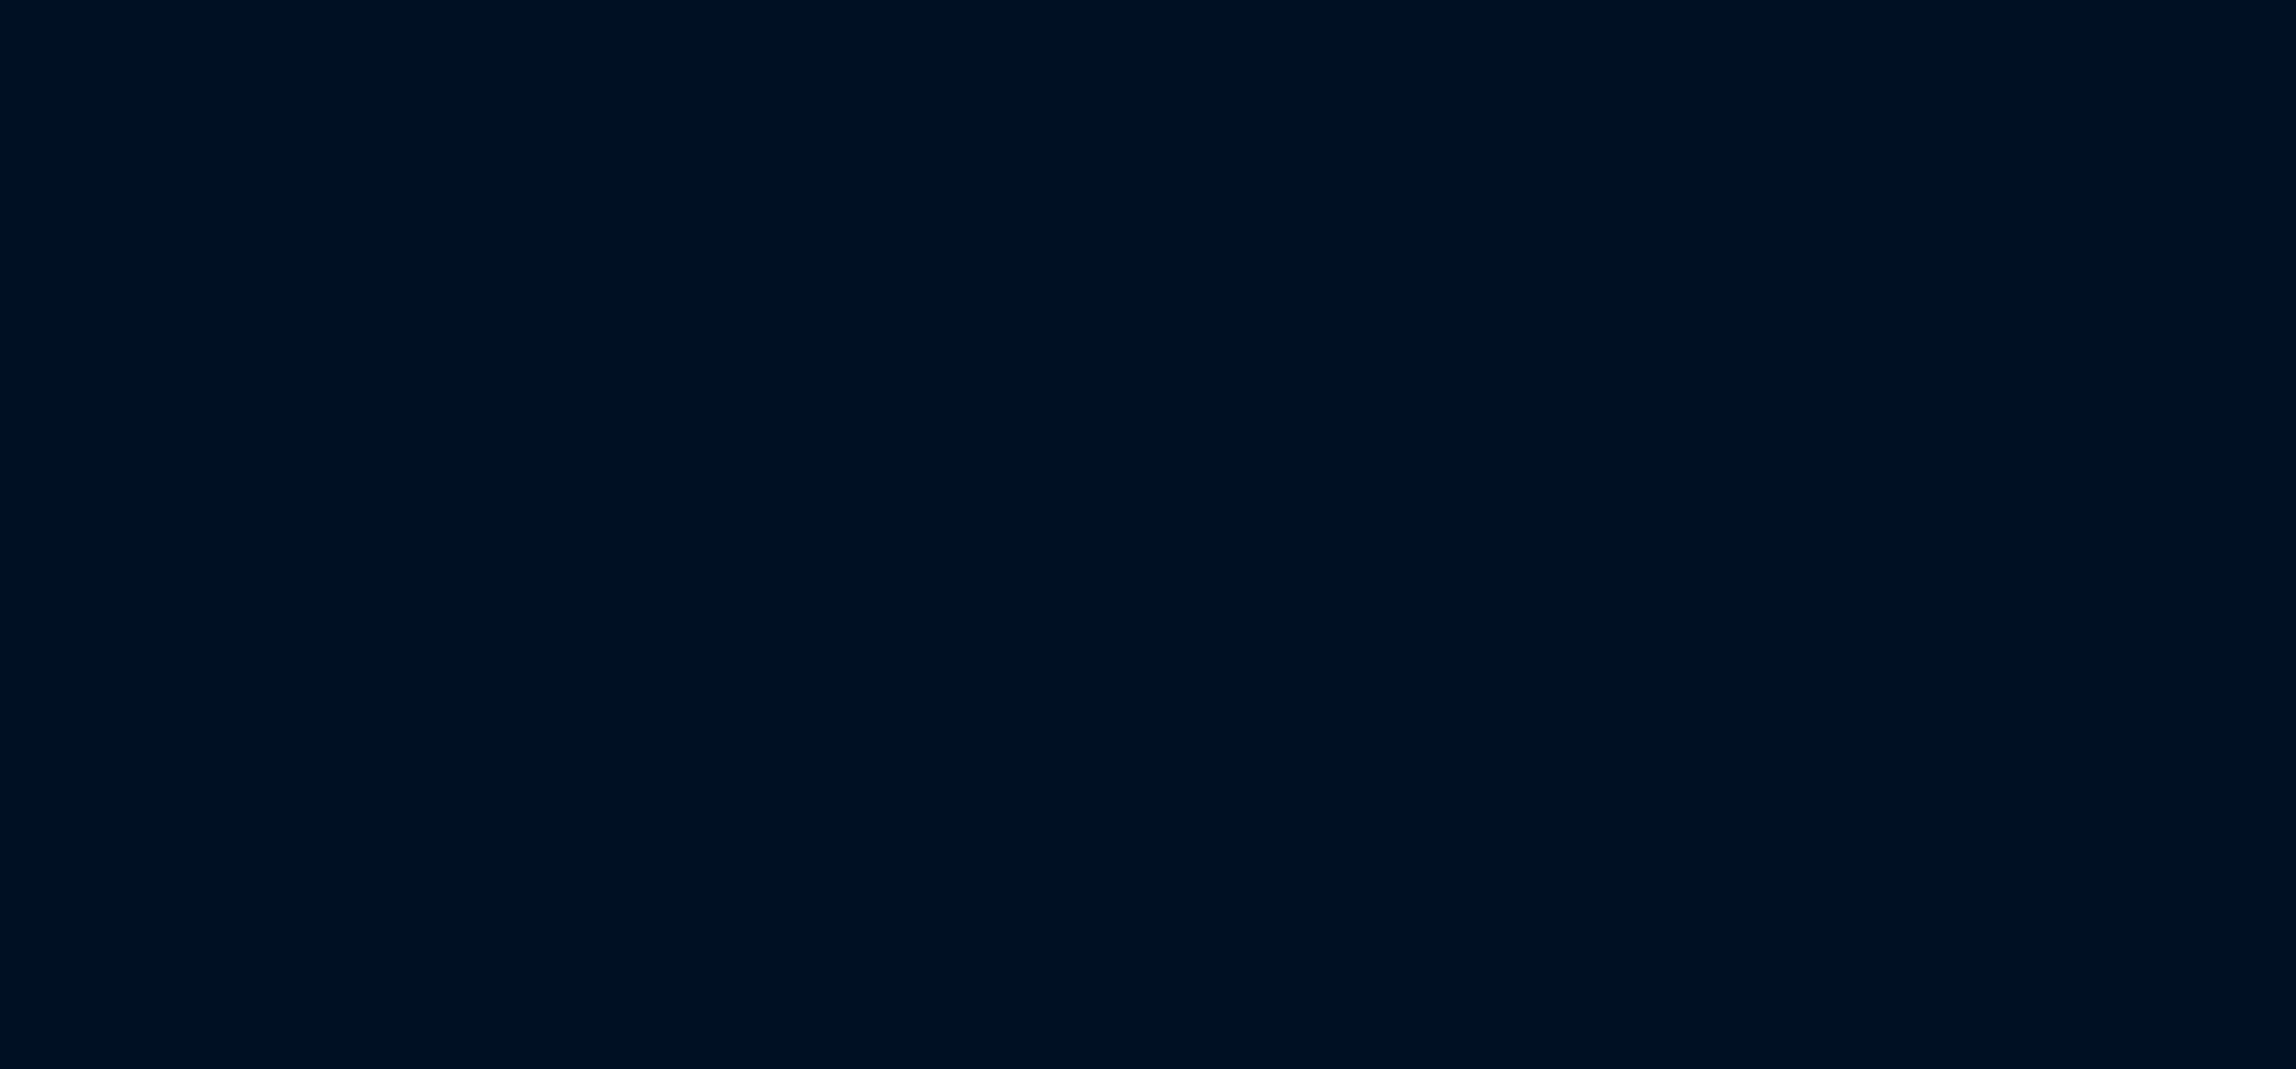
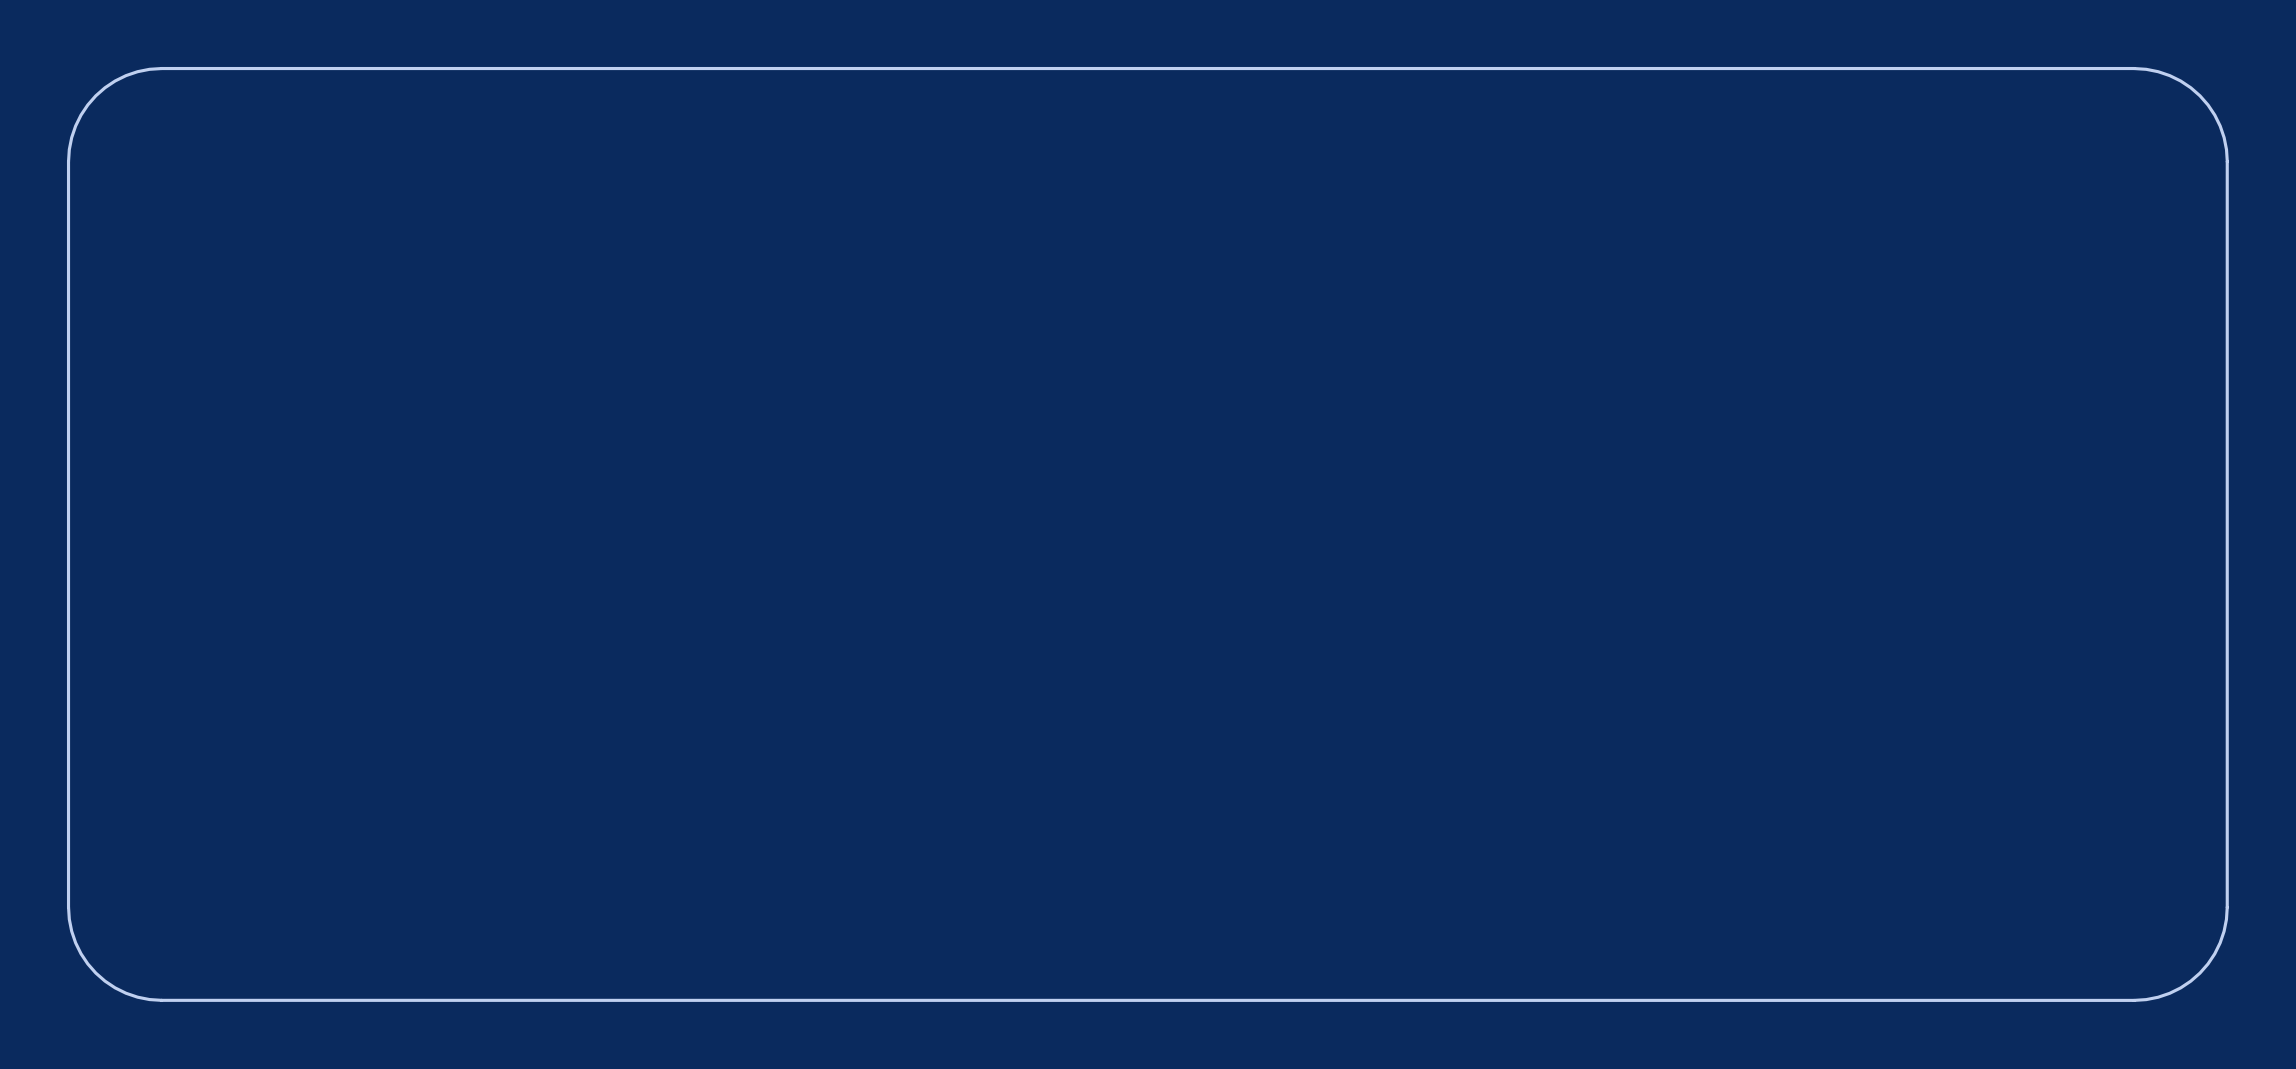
board edge: none -> (161, 68) (2134, 68) (2146, 69) (2169, 75) (2190, 87) (2208, 105) (2220, 126) (2224, 137) (2227, 161) (2227, 907) (2226, 919) (2220, 942) (2208, 963) (2190, 981) (2169, 993) (2158, 997) (2134, 1000) (161, 1000) (149, 999) (126, 993) (104, 981) (87, 963) (75, 942) (69, 919) (68, 161) (71, 137) (75, 126) (87, 104) (95, 95) (115, 81) (126, 75) (137, 71) (161, 68)

